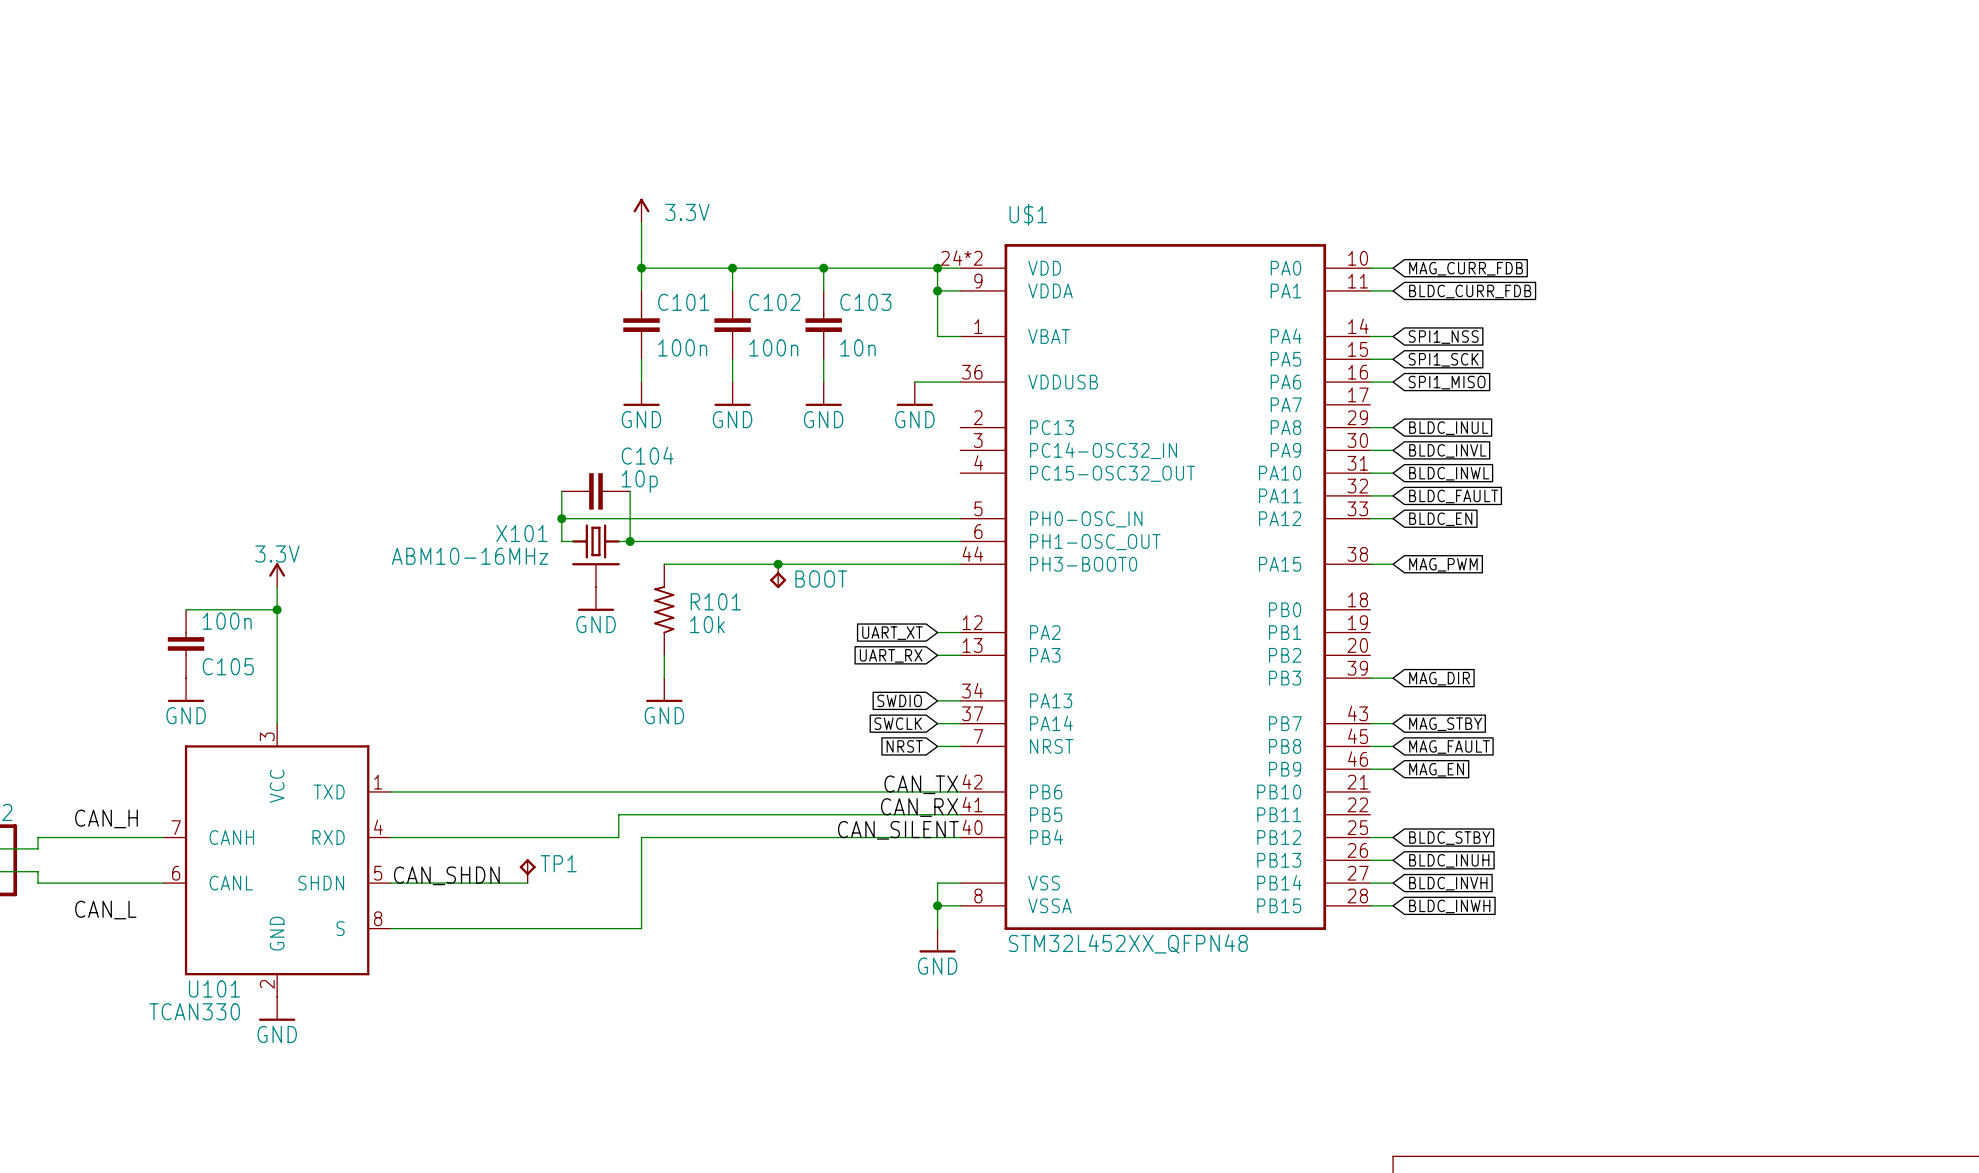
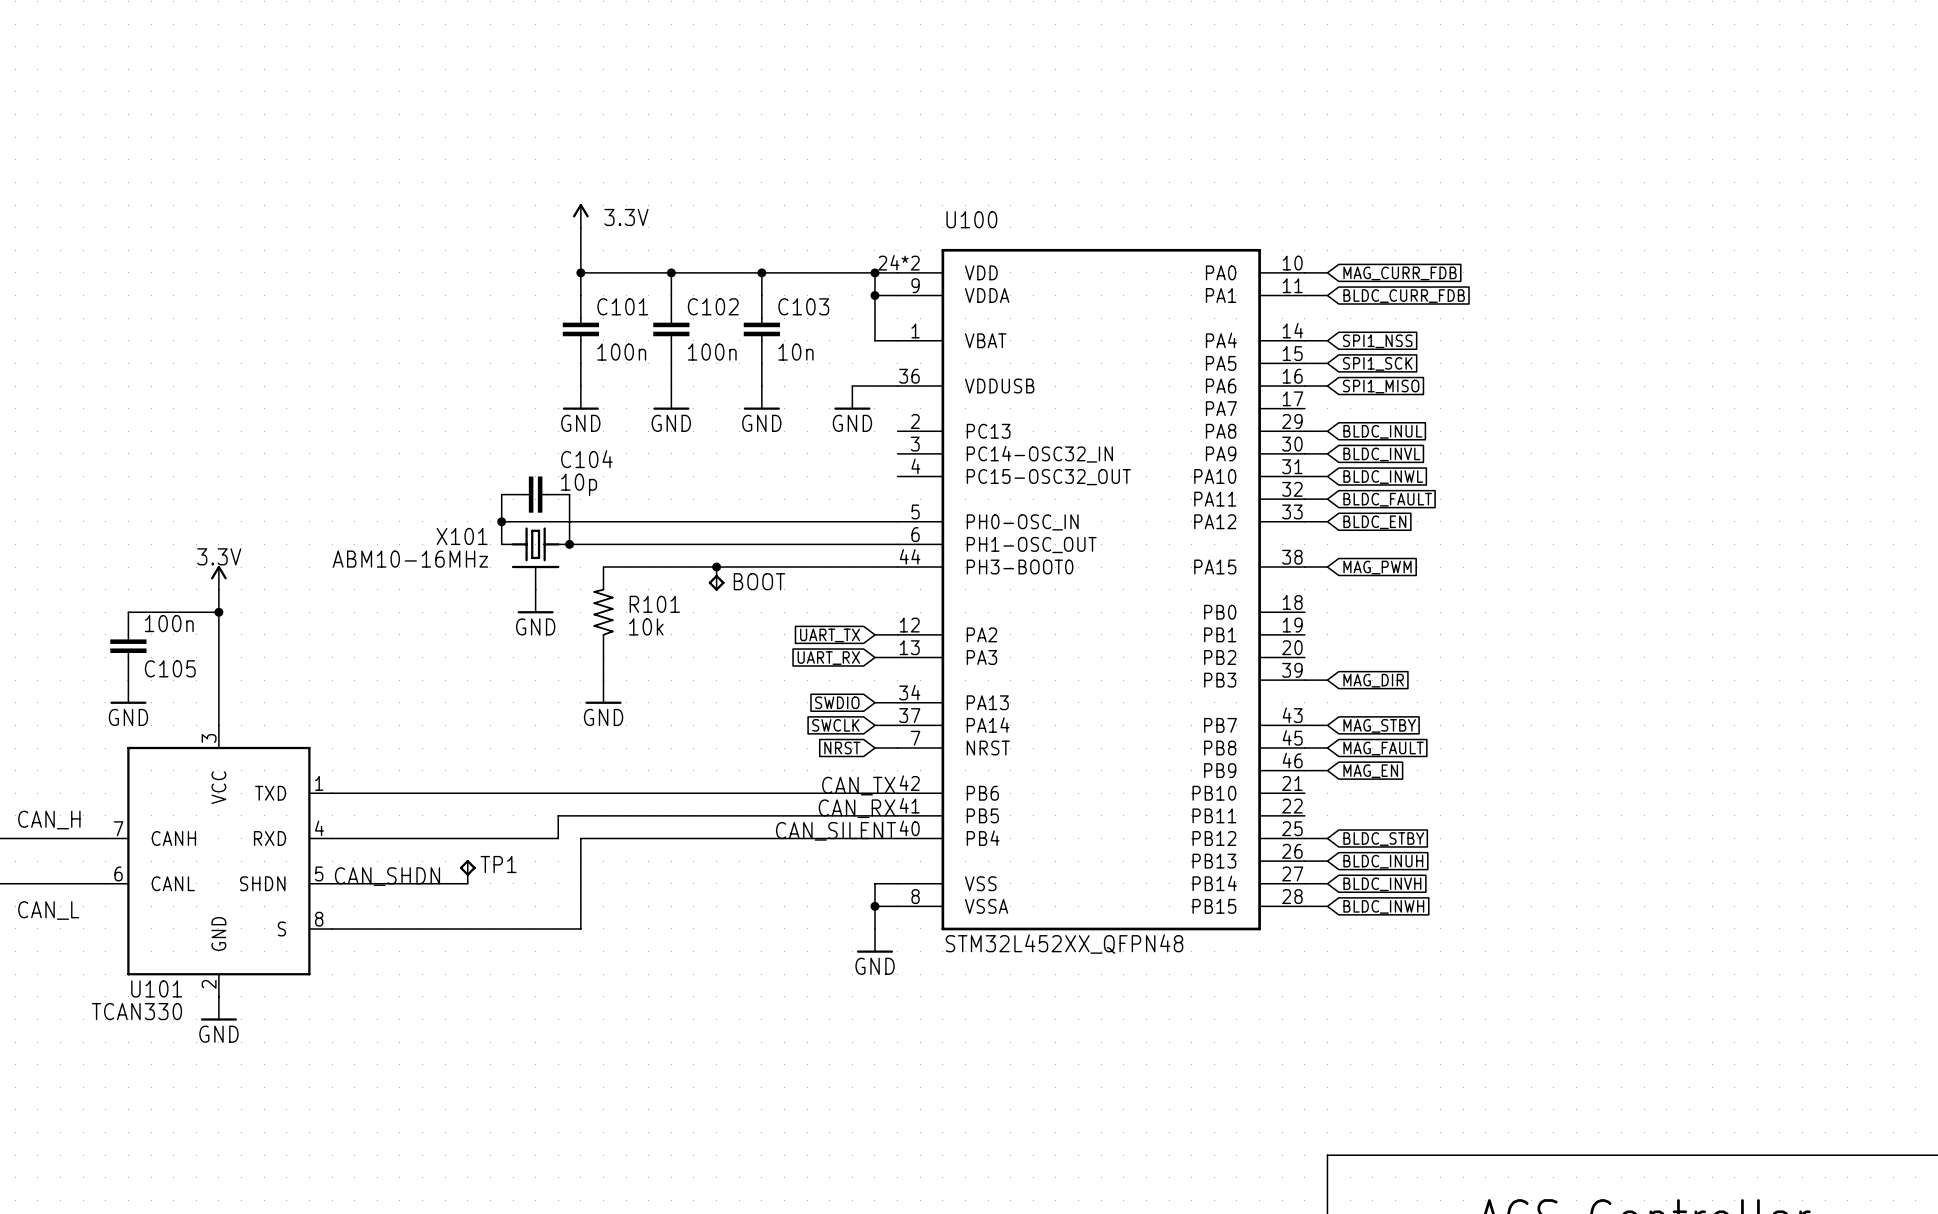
U$1 name: U$1 (1028, 214) -> U100 (971, 219)
global label: UART_XT (892, 633) -> UART_TX (830, 635)

